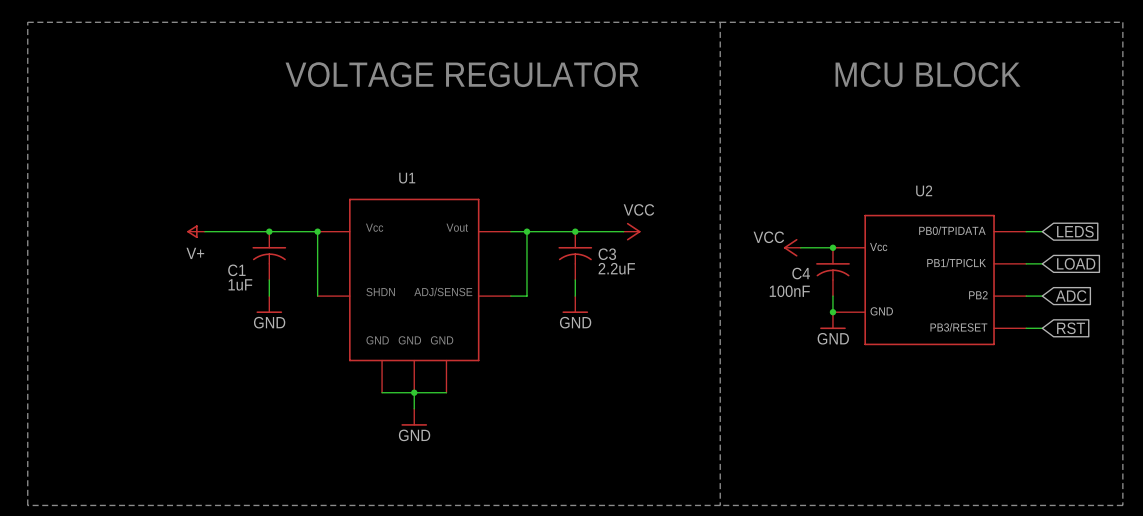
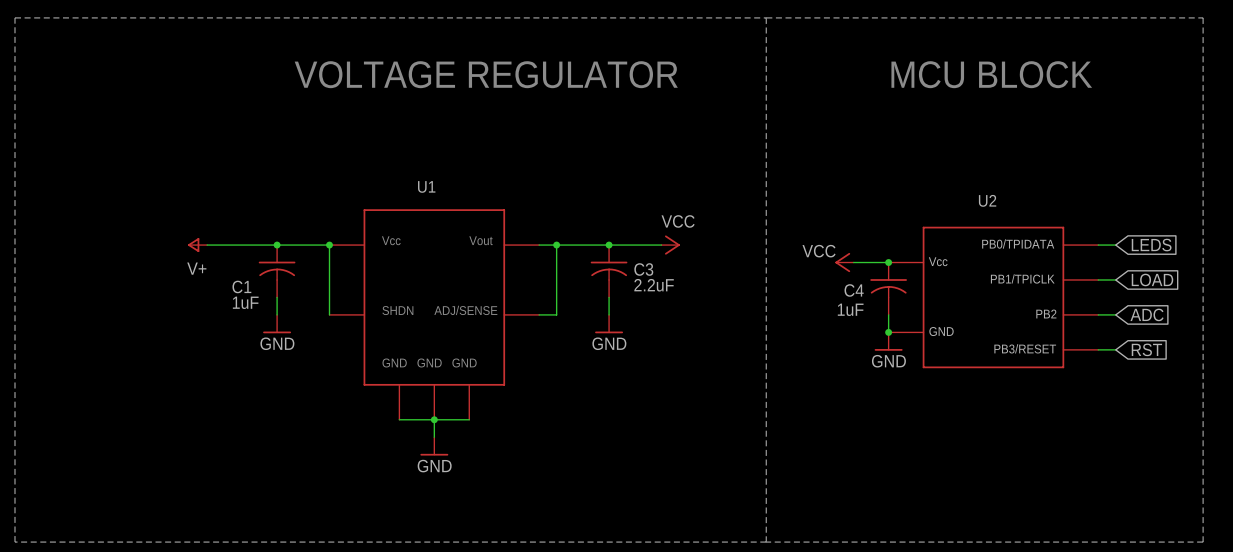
C4 value: 100nF (789, 291) -> 1uF (850, 309)

